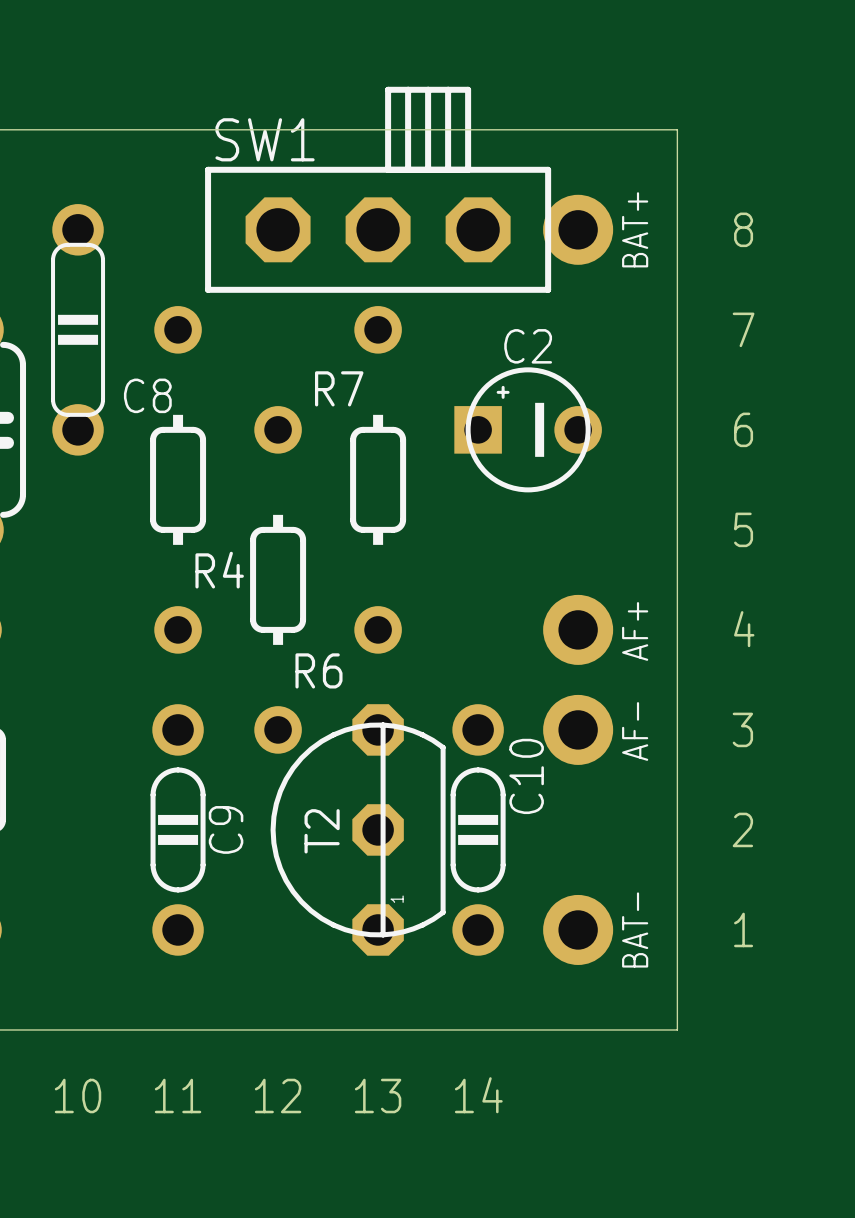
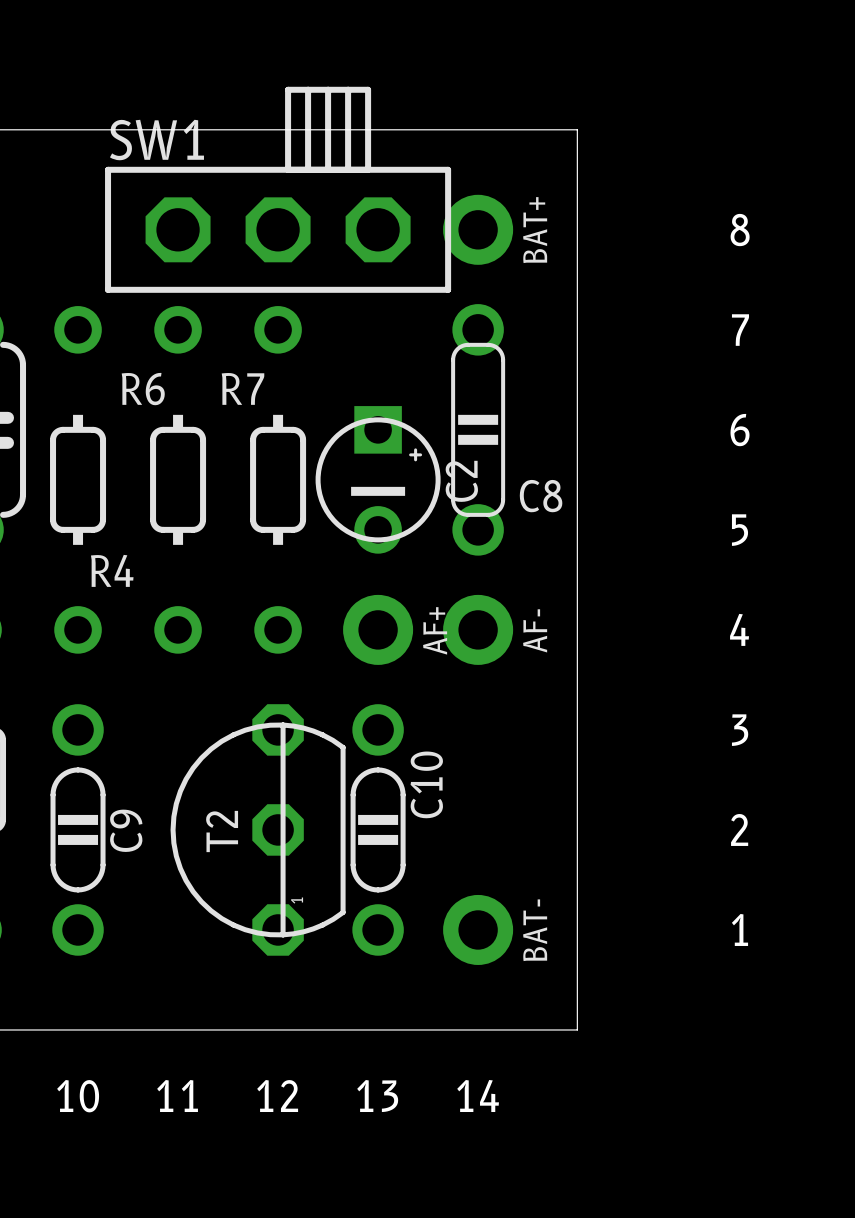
board edge: (577, 129) (677, 129) (677, 1029) (577, 1029) -> (577, 129) (577, 1029)
SW1 position: (378, 189) -> (278, 189)
BAT+ position: (578, 229) -> (478, 229)
C8 position: (78, 329) -> (478, 429)
C2 rotation: 0° (528, 429) -> 90° clockwise (378, 479)
C2 position: (528, 429) -> (378, 479)
R4: none -> (78, 479)
R7 position: (378, 479) -> (278, 479)
R4 name: R4 (219, 570) -> R6 (143, 389)
R6: (278, 579) -> none
AF+ position: (578, 629) -> (378, 629)
AF- position: (578, 729) -> (478, 629)
C9 position: (178, 829) -> (78, 829)
T2 position: (358, 829) -> (258, 829)
C10 position: (478, 829) -> (378, 829)
BAT- position: (578, 929) -> (478, 929)

